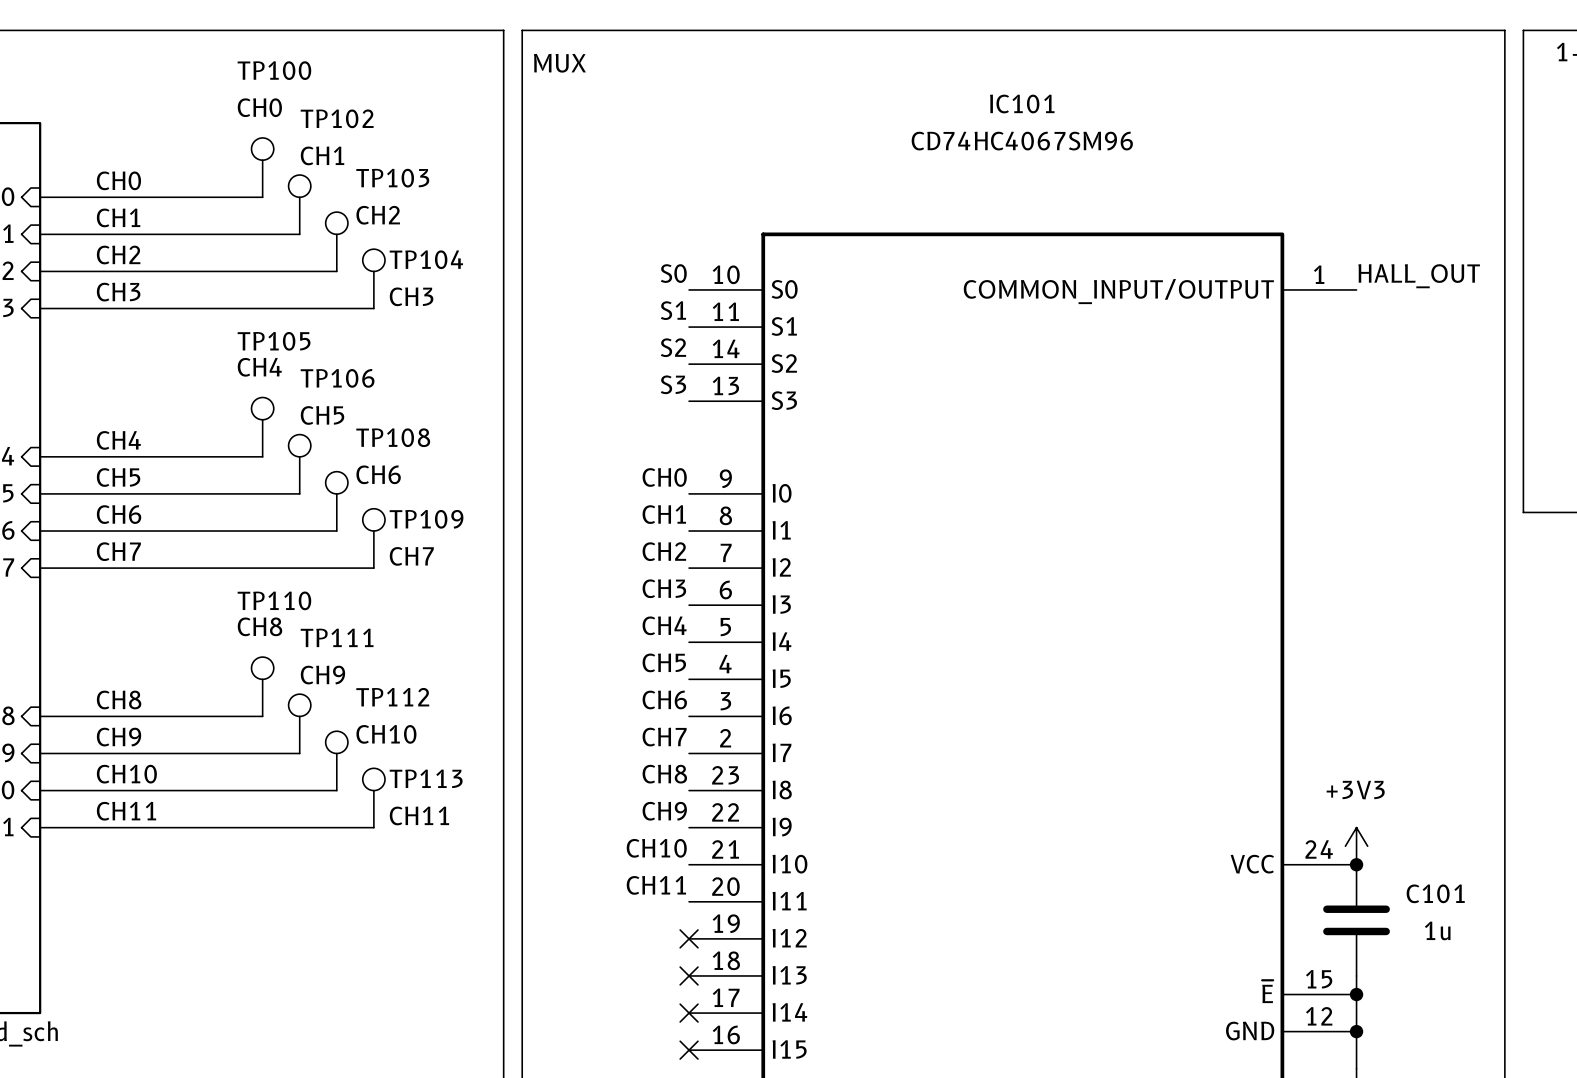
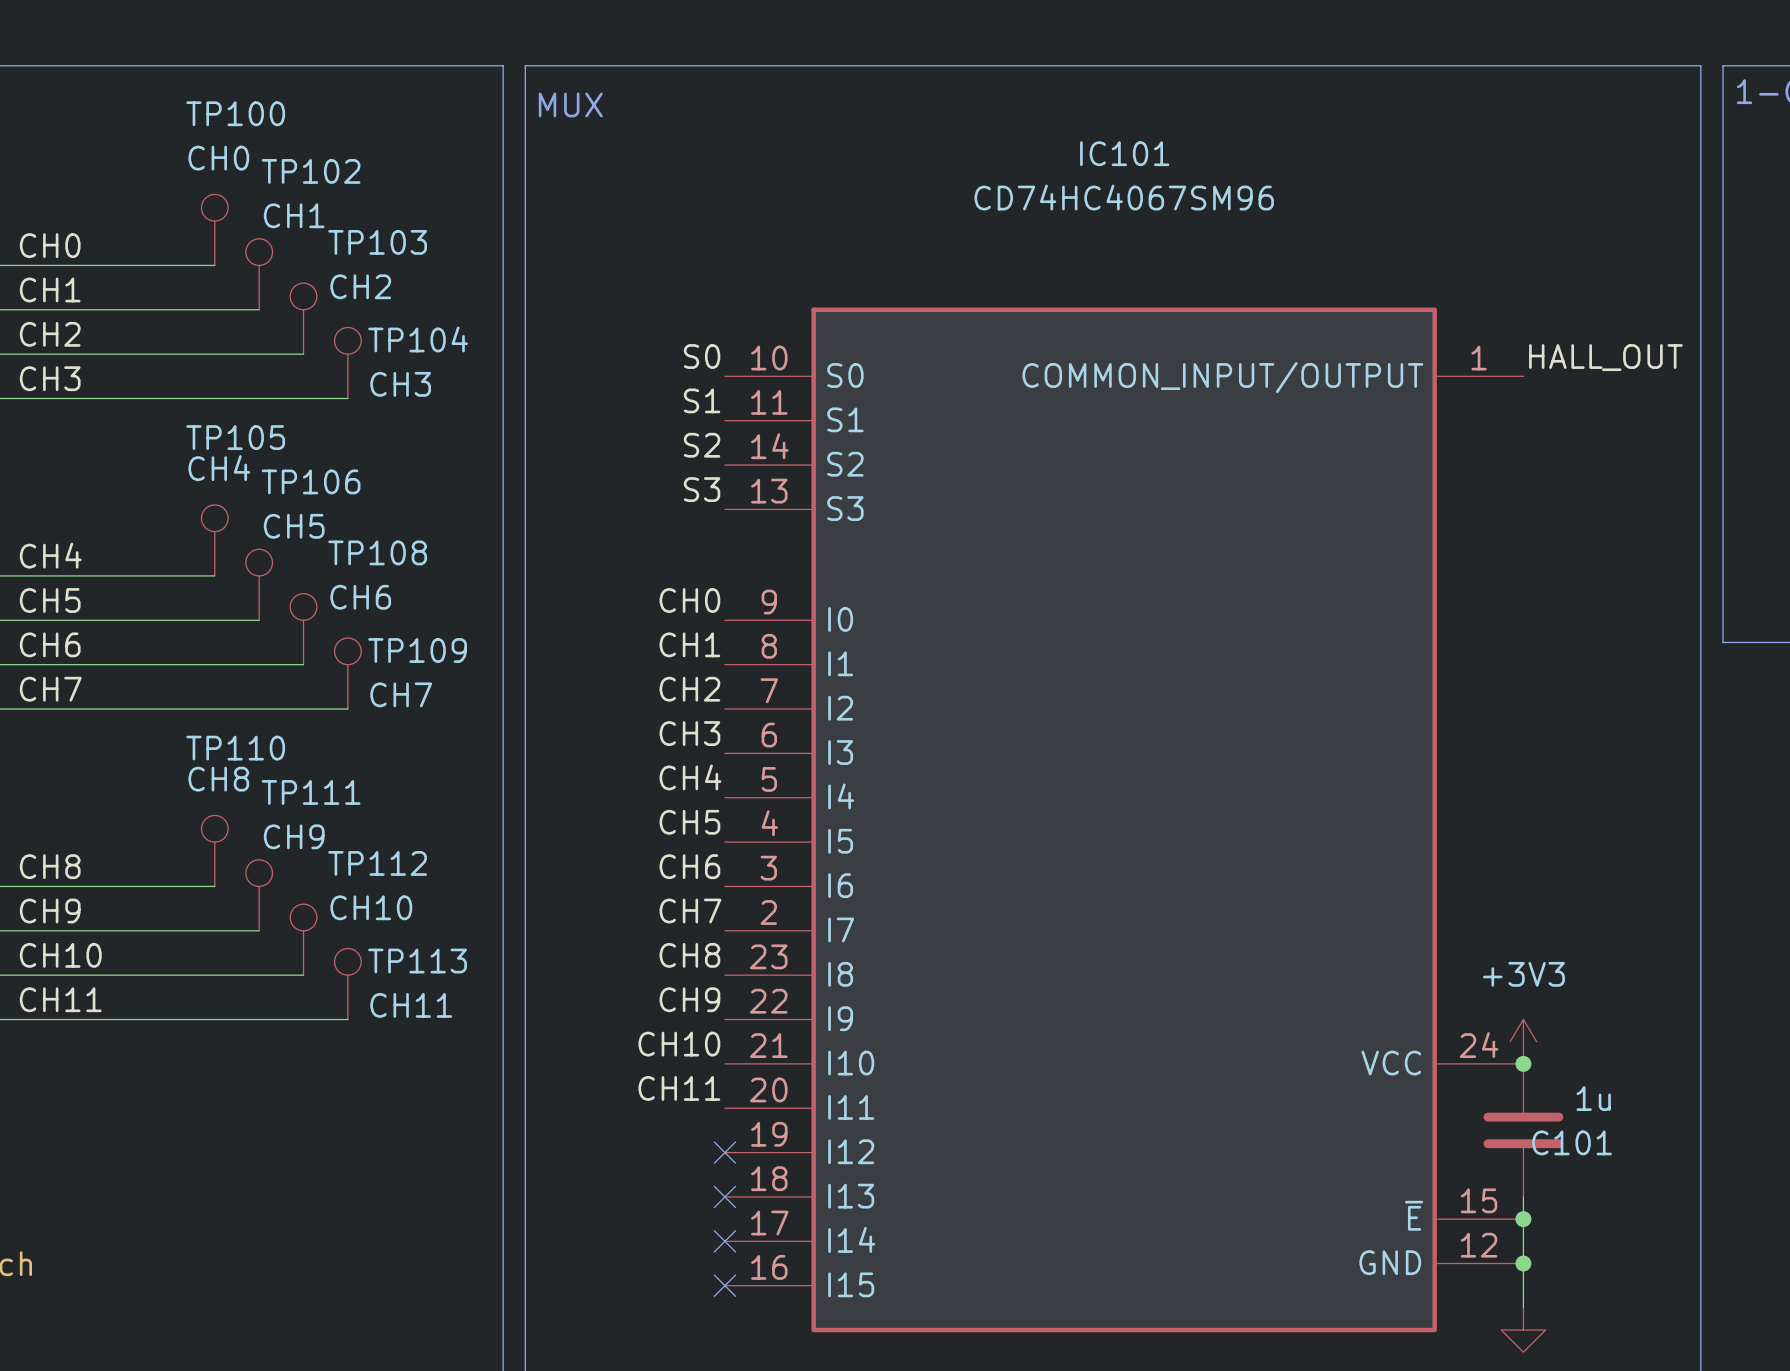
C101 name position: C101 (1435, 893) -> C101 (1572, 1142)
C101 value position: 1u (1437, 930) -> 1u (1593, 1098)

